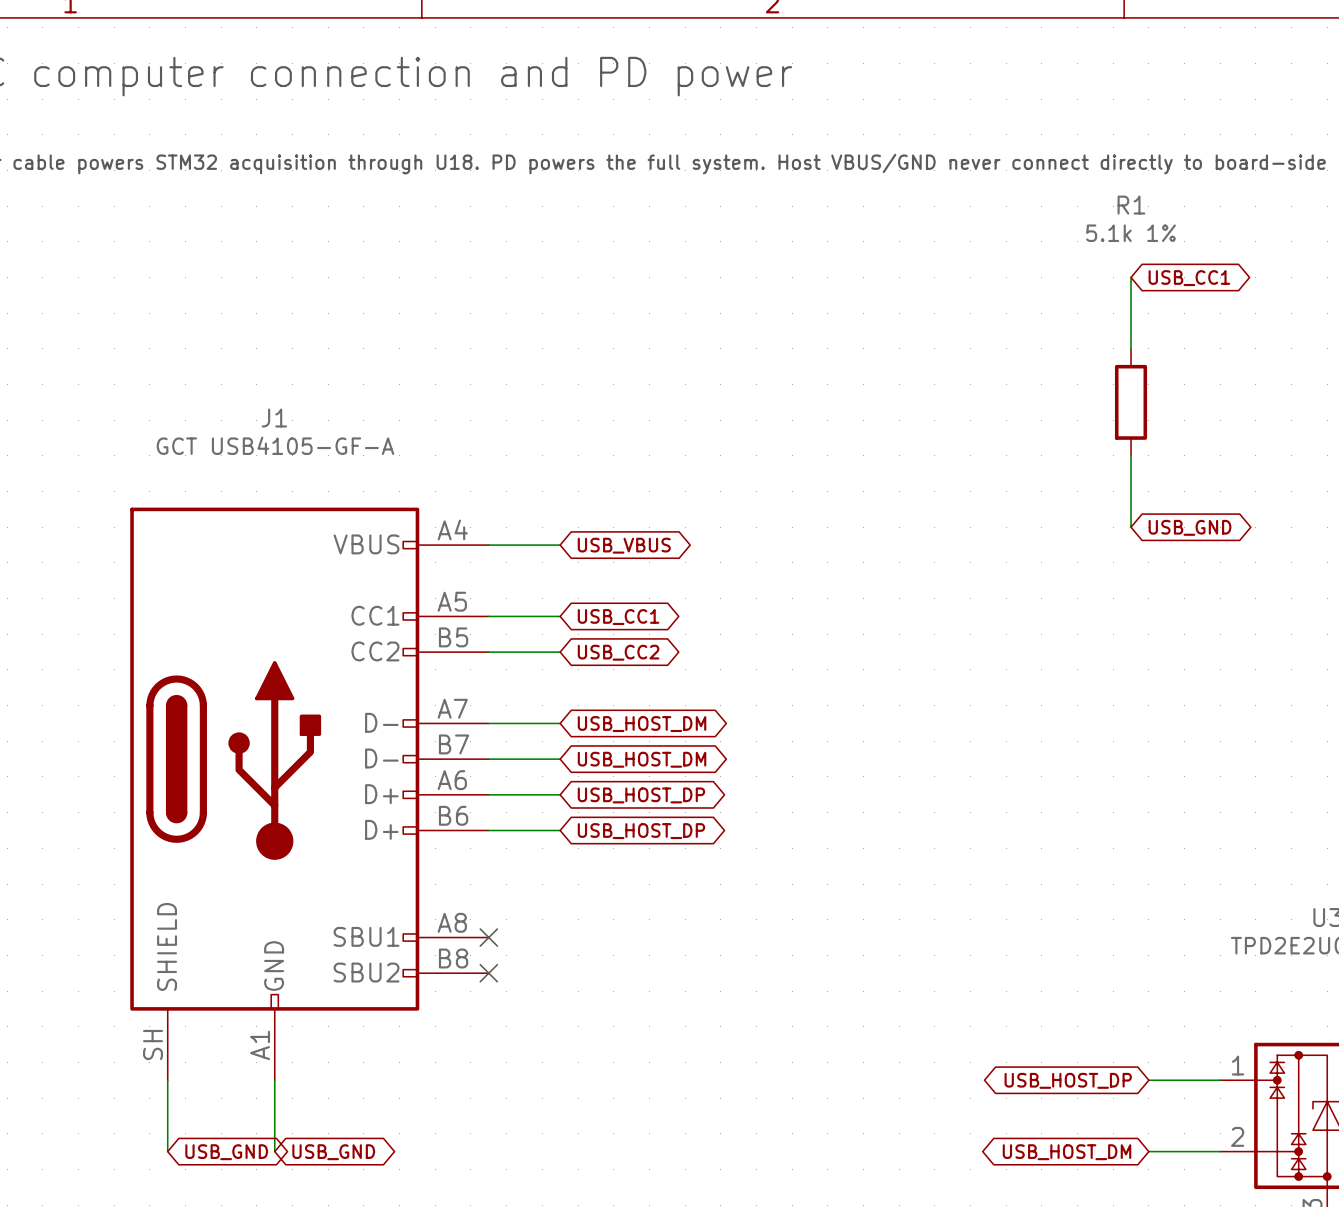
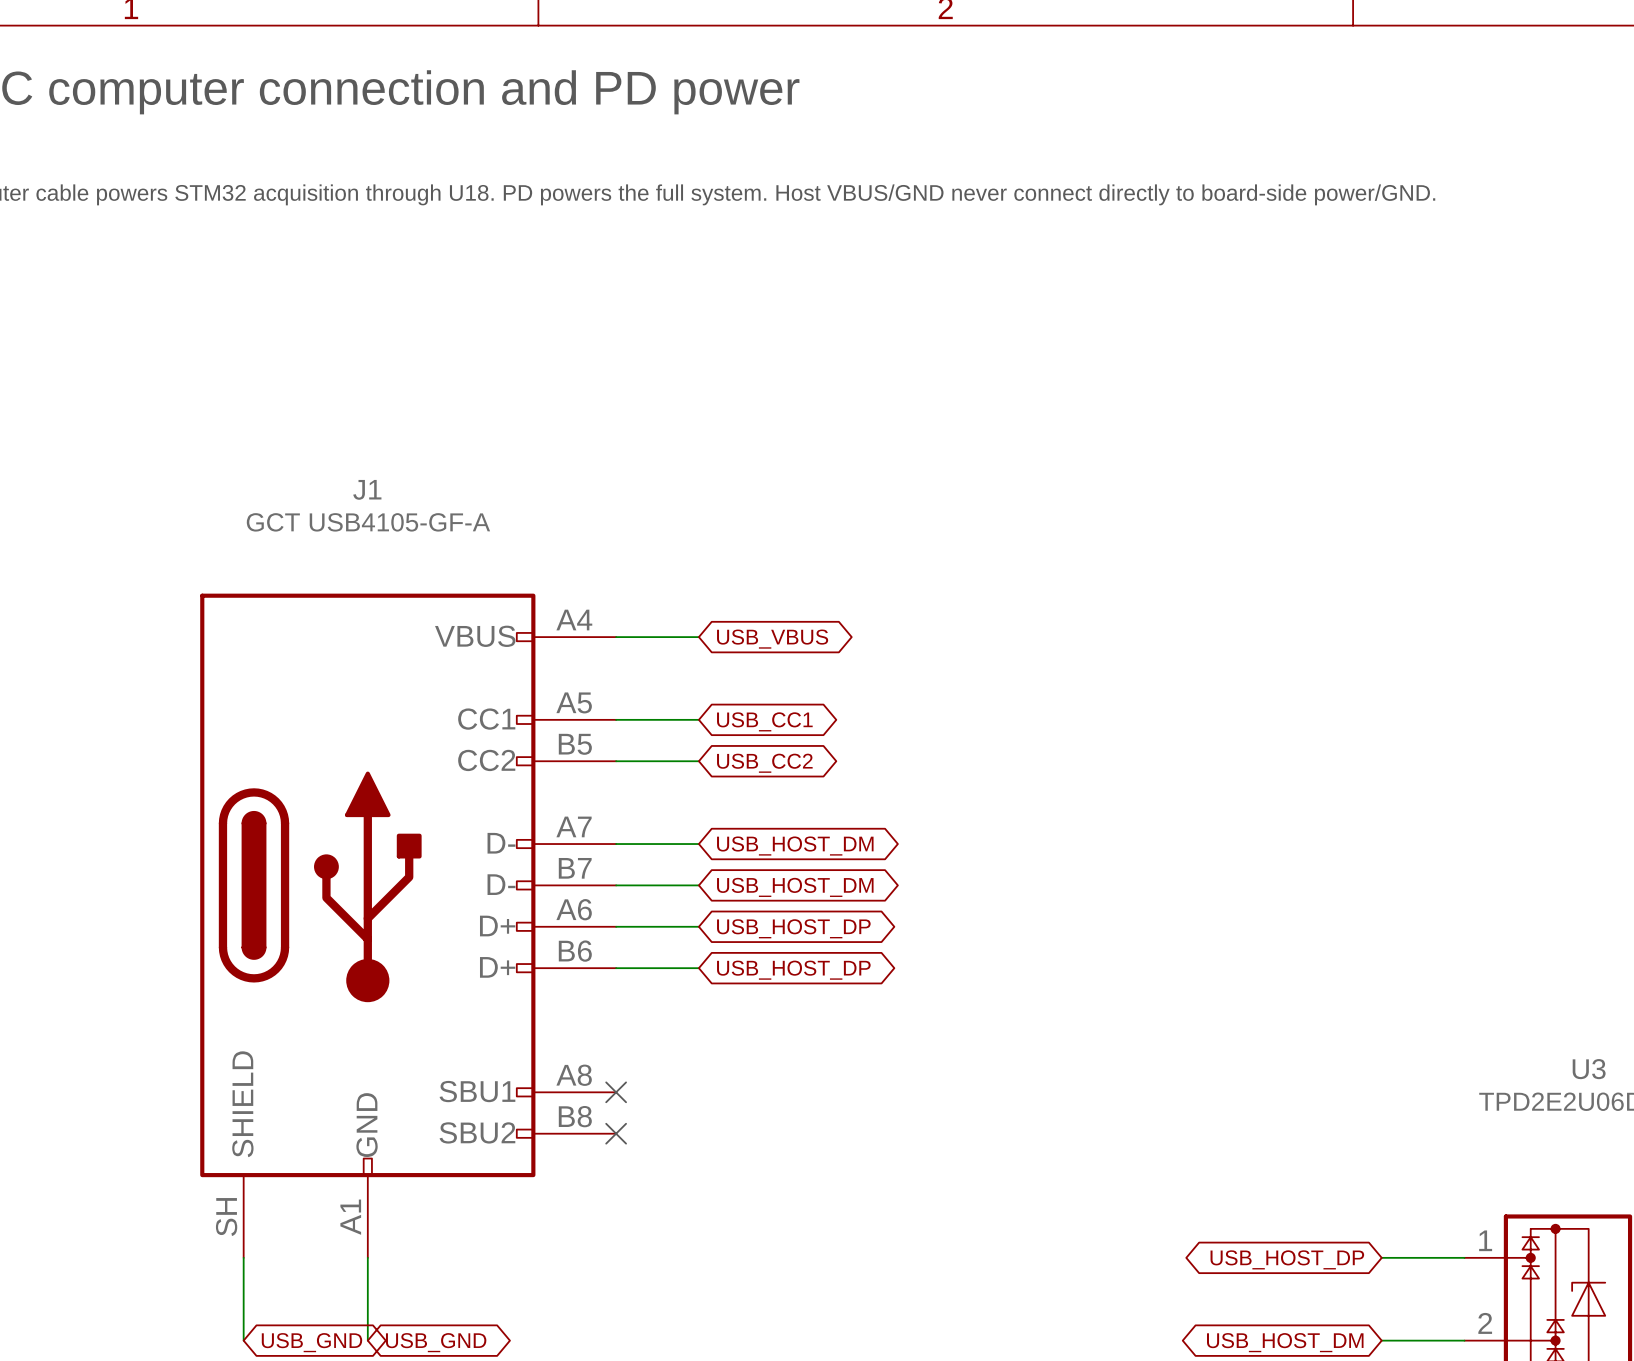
wire: (1131, 277) (1131, 348) -> none
global label: USB_CC1 (1189, 278) -> none
R1: 5.1k 1% (1131, 402) -> none
wire: (1131, 455) (1131, 527) -> none
global label: USB_GND (1189, 527) -> none

